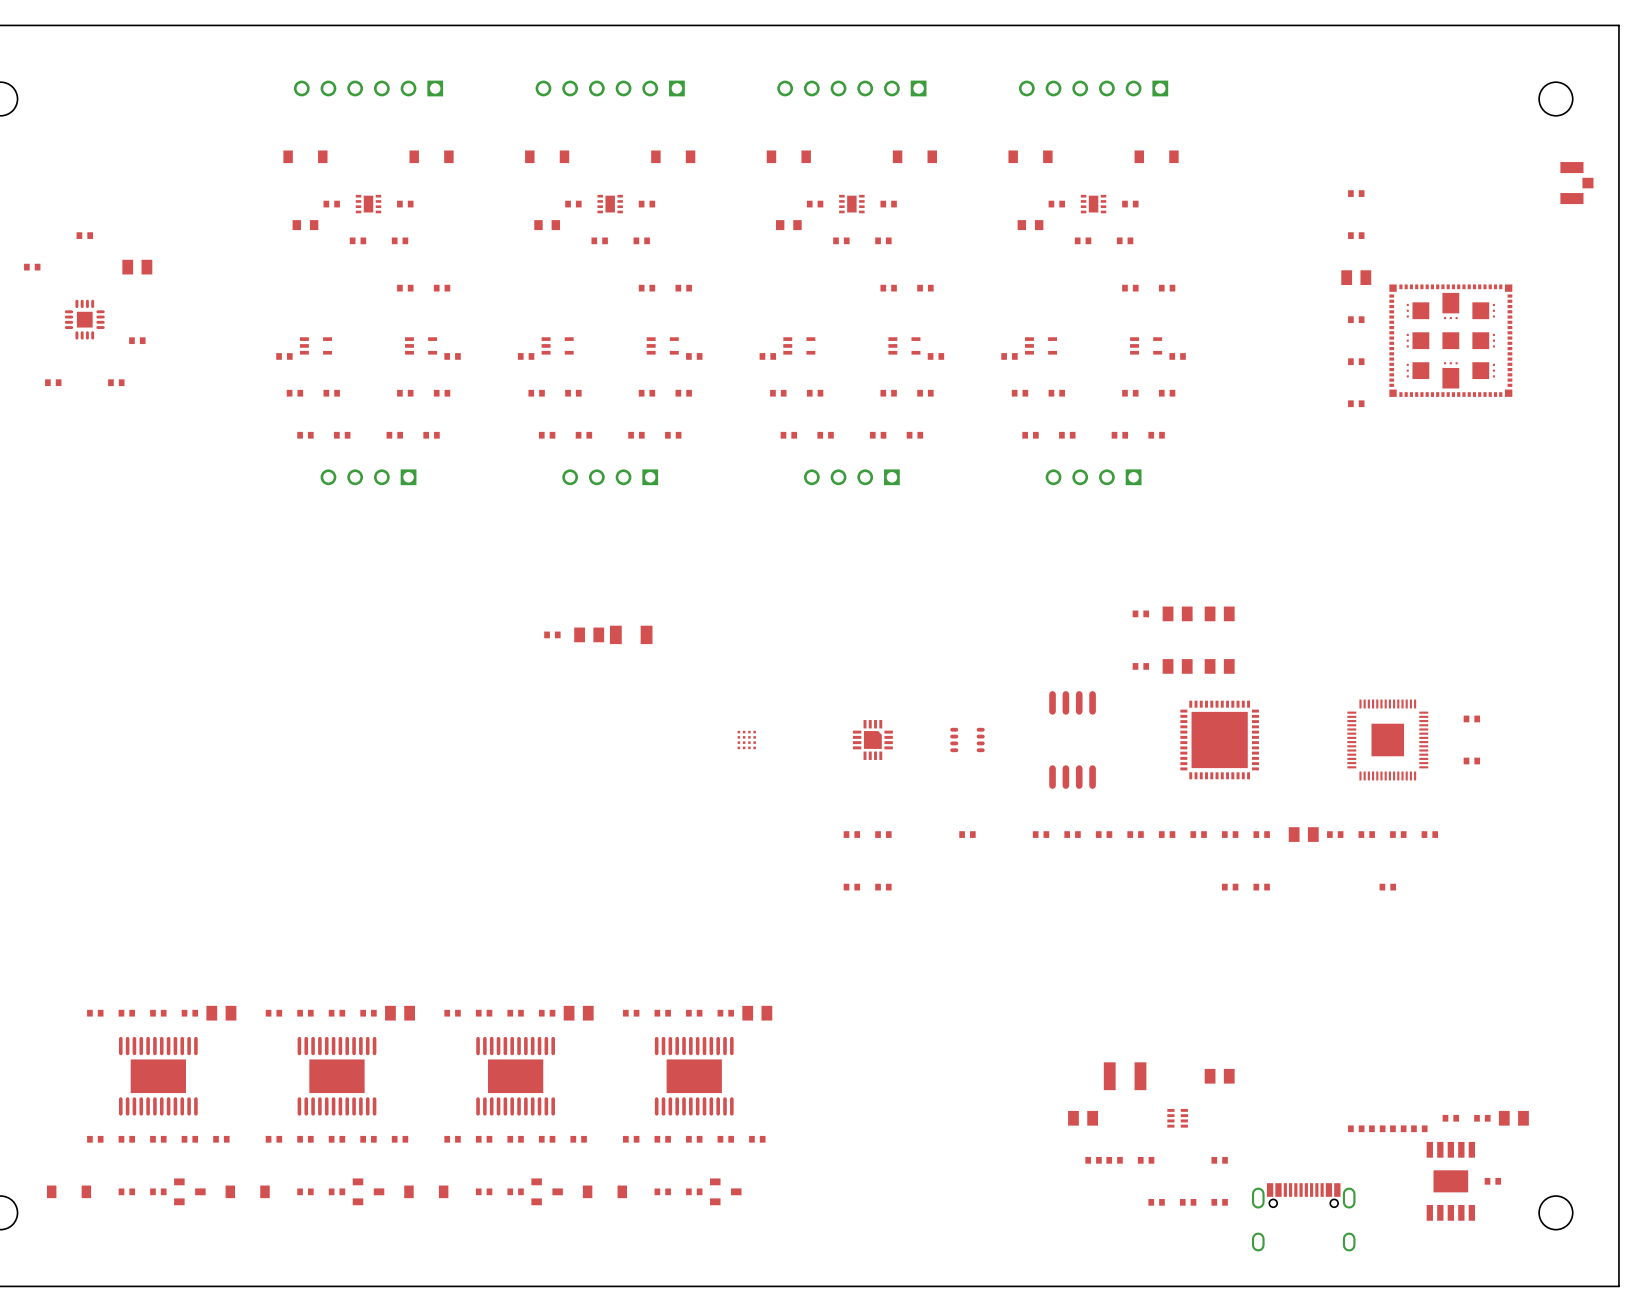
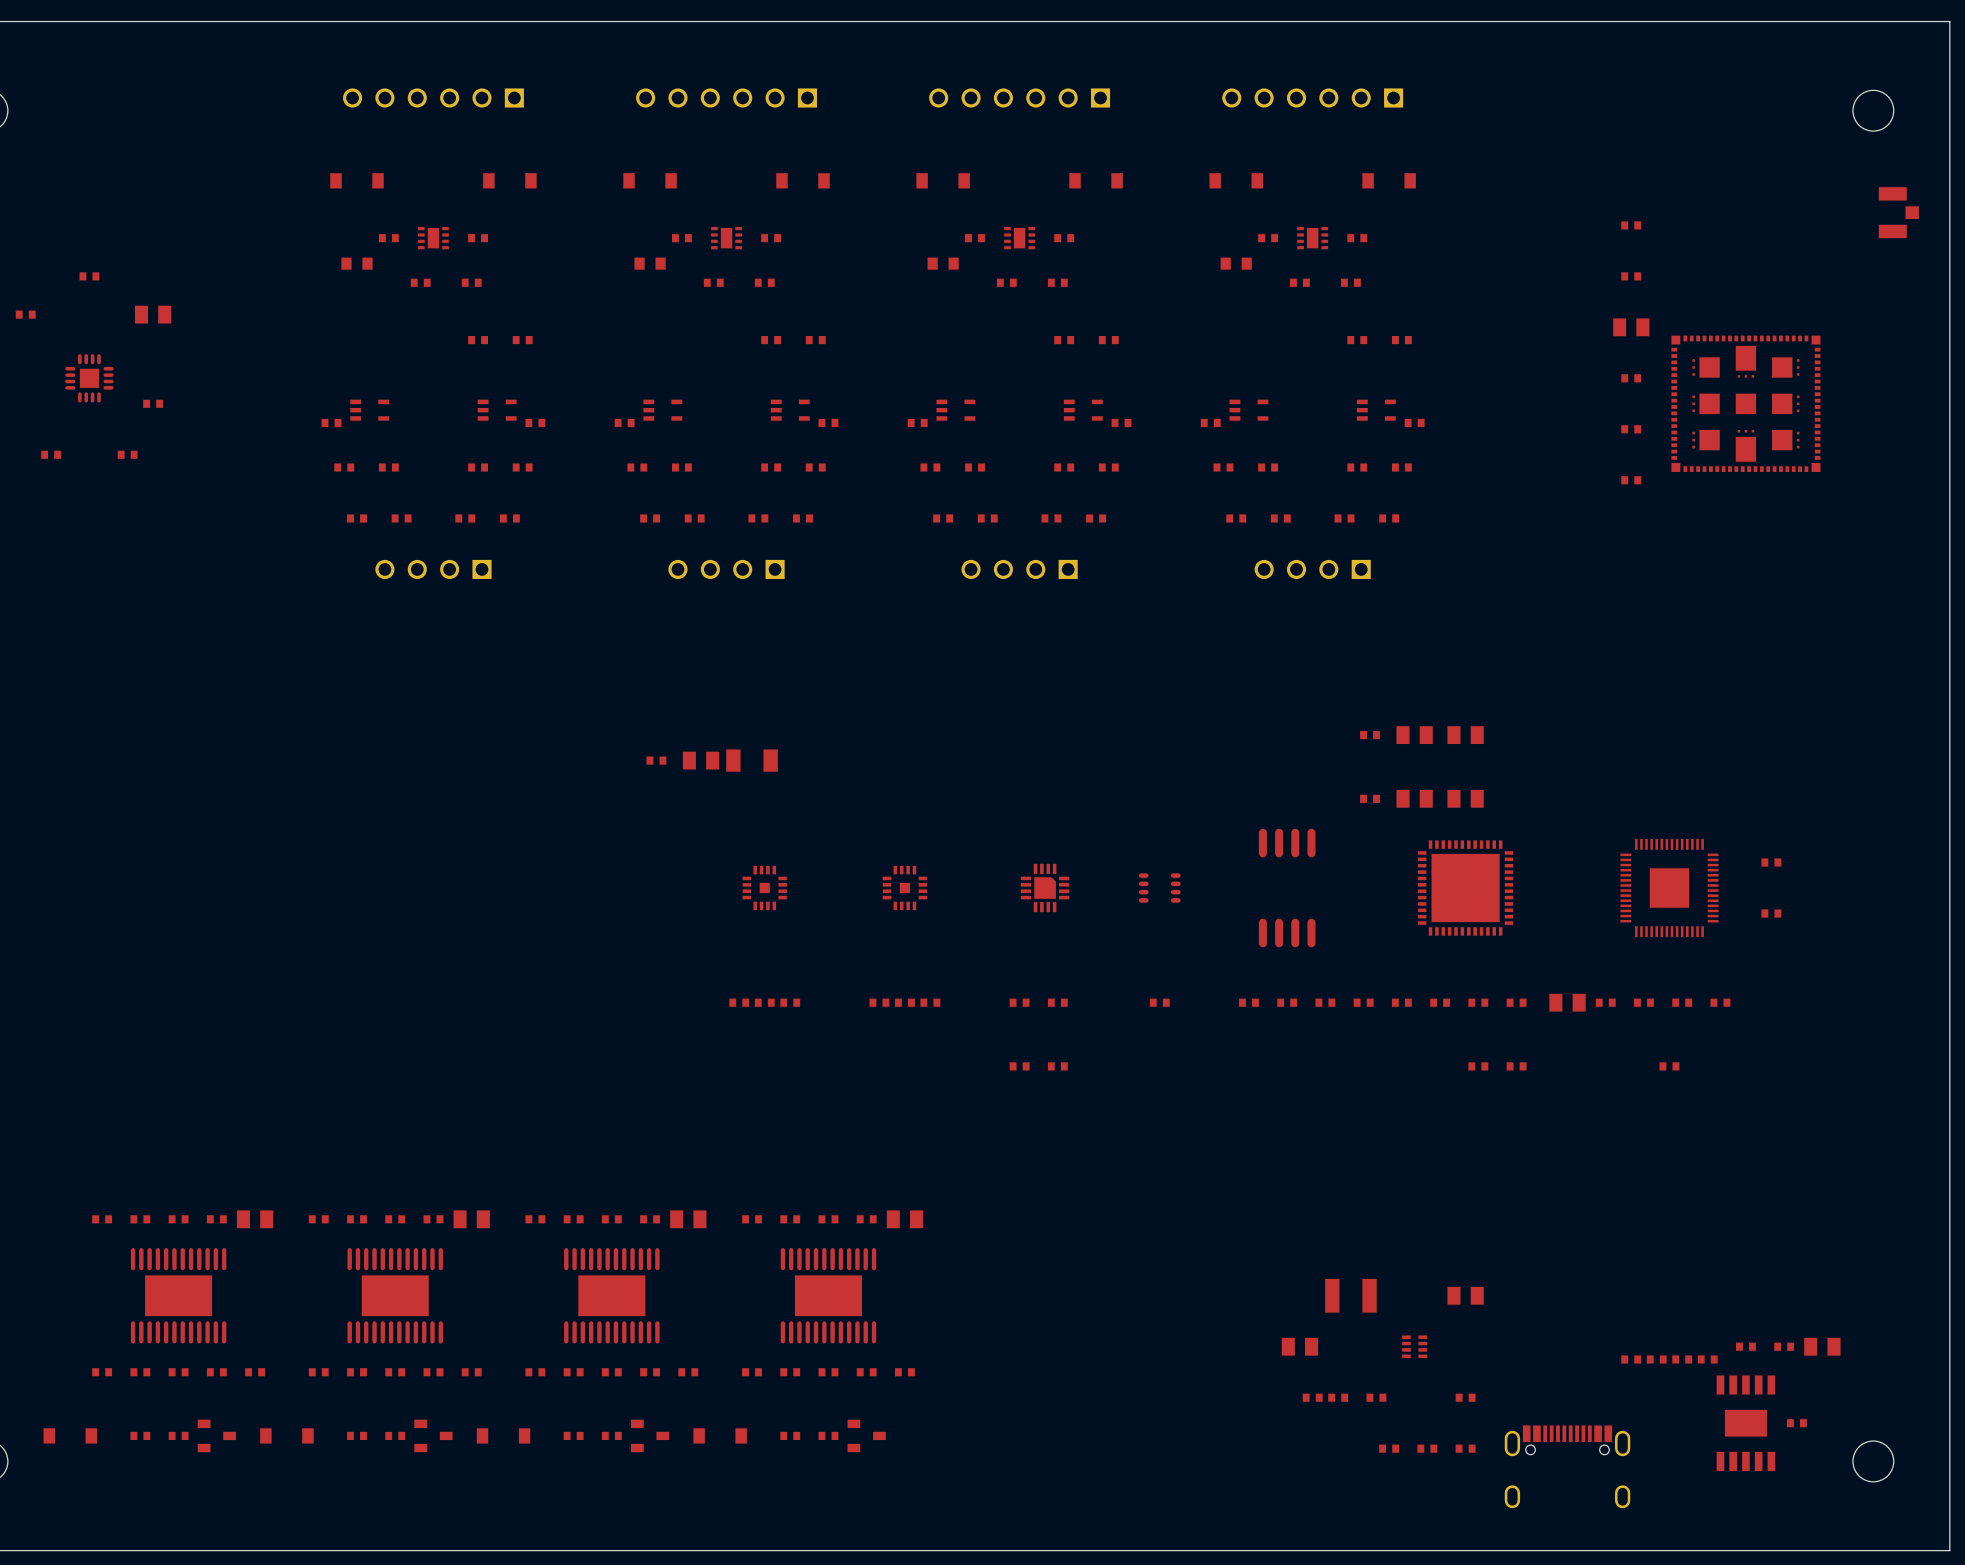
part footprint: [737, 730, 756, 750] -> [882, 865, 928, 911]
part: none -> (764, 888)
part: none -> (739, 1002)
part: none -> (764, 1002)
part: none -> (790, 1002)
part: none -> (879, 1002)
part: none -> (904, 1002)
part: none -> (930, 1002)

